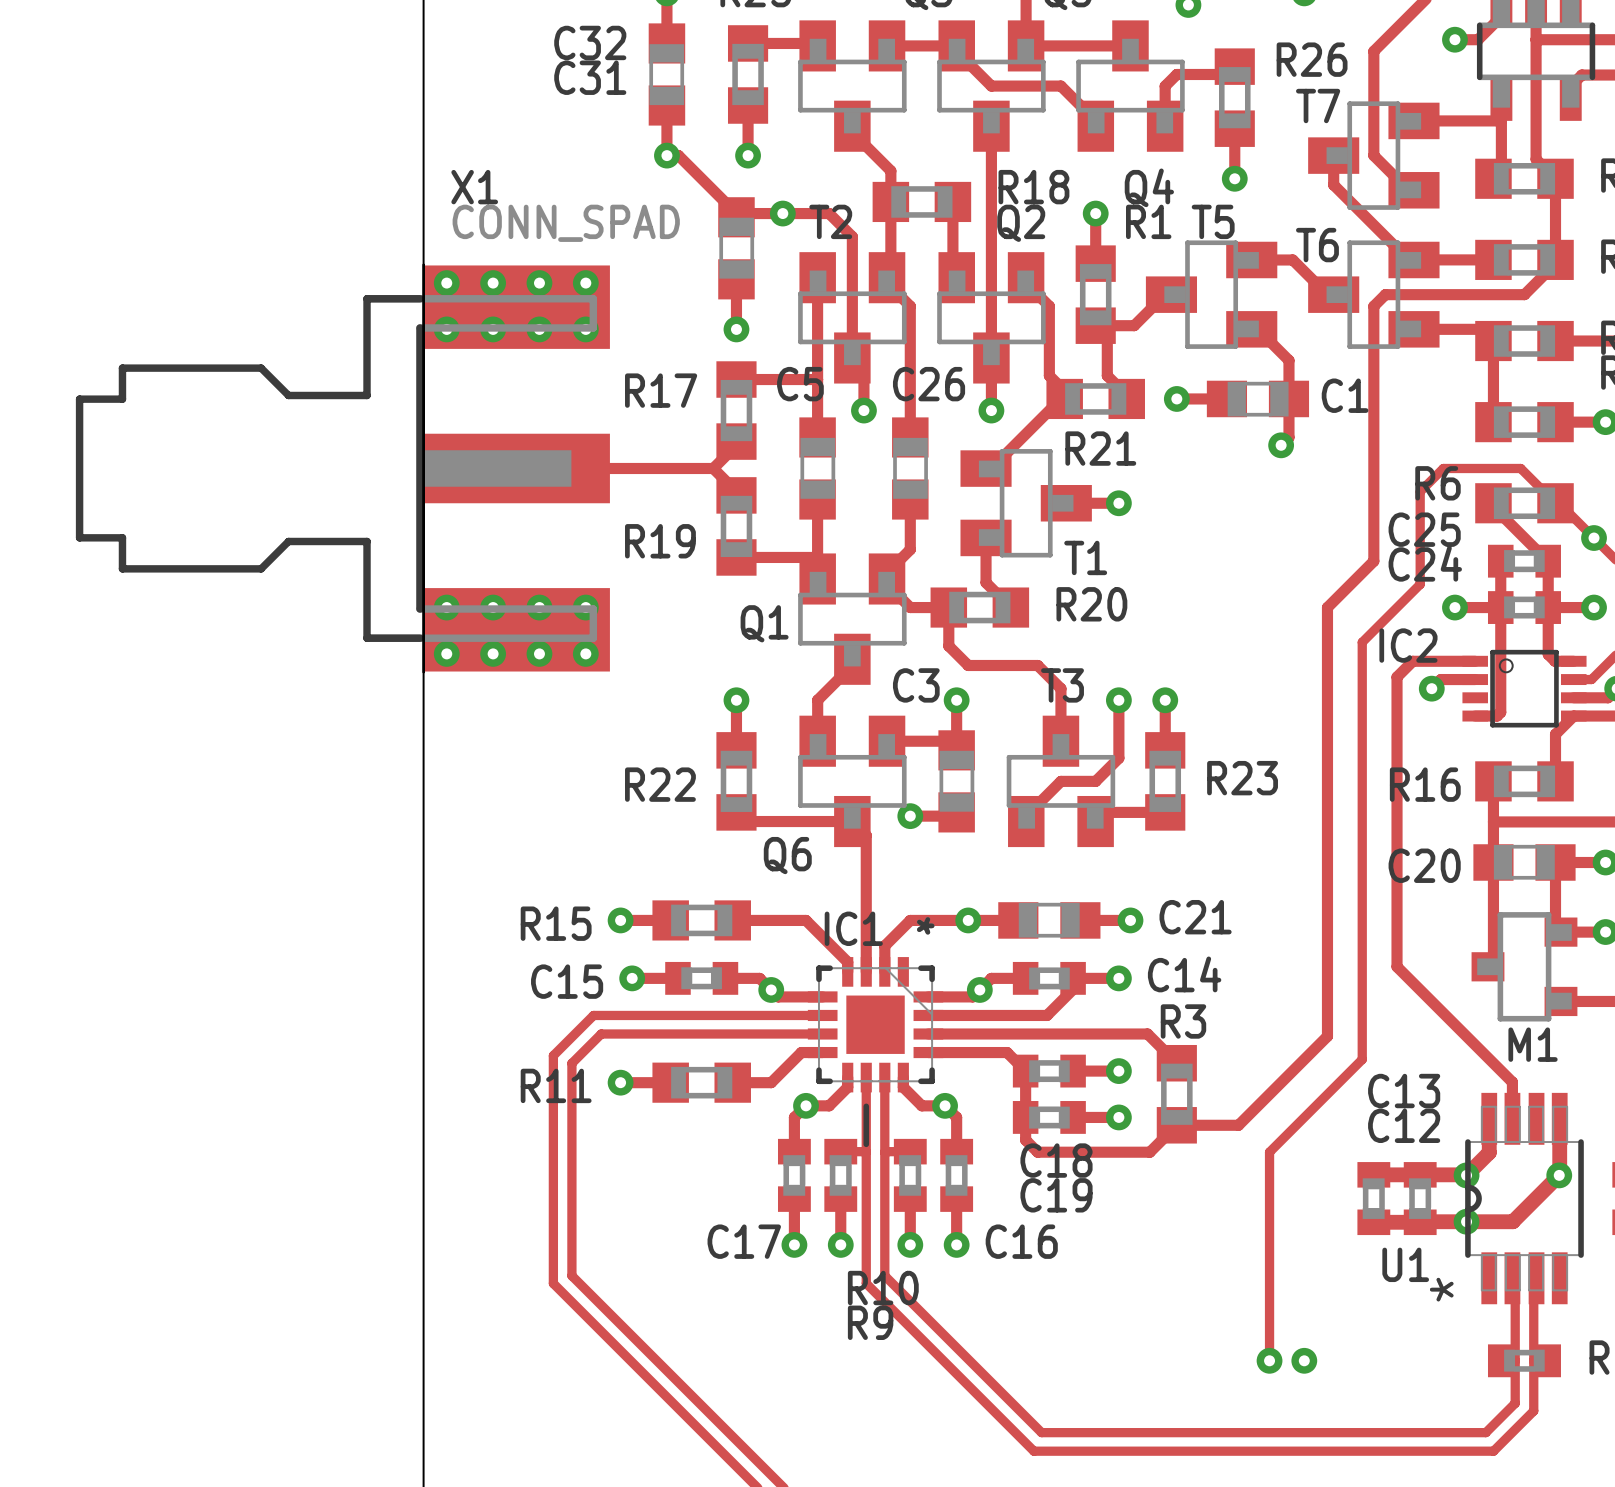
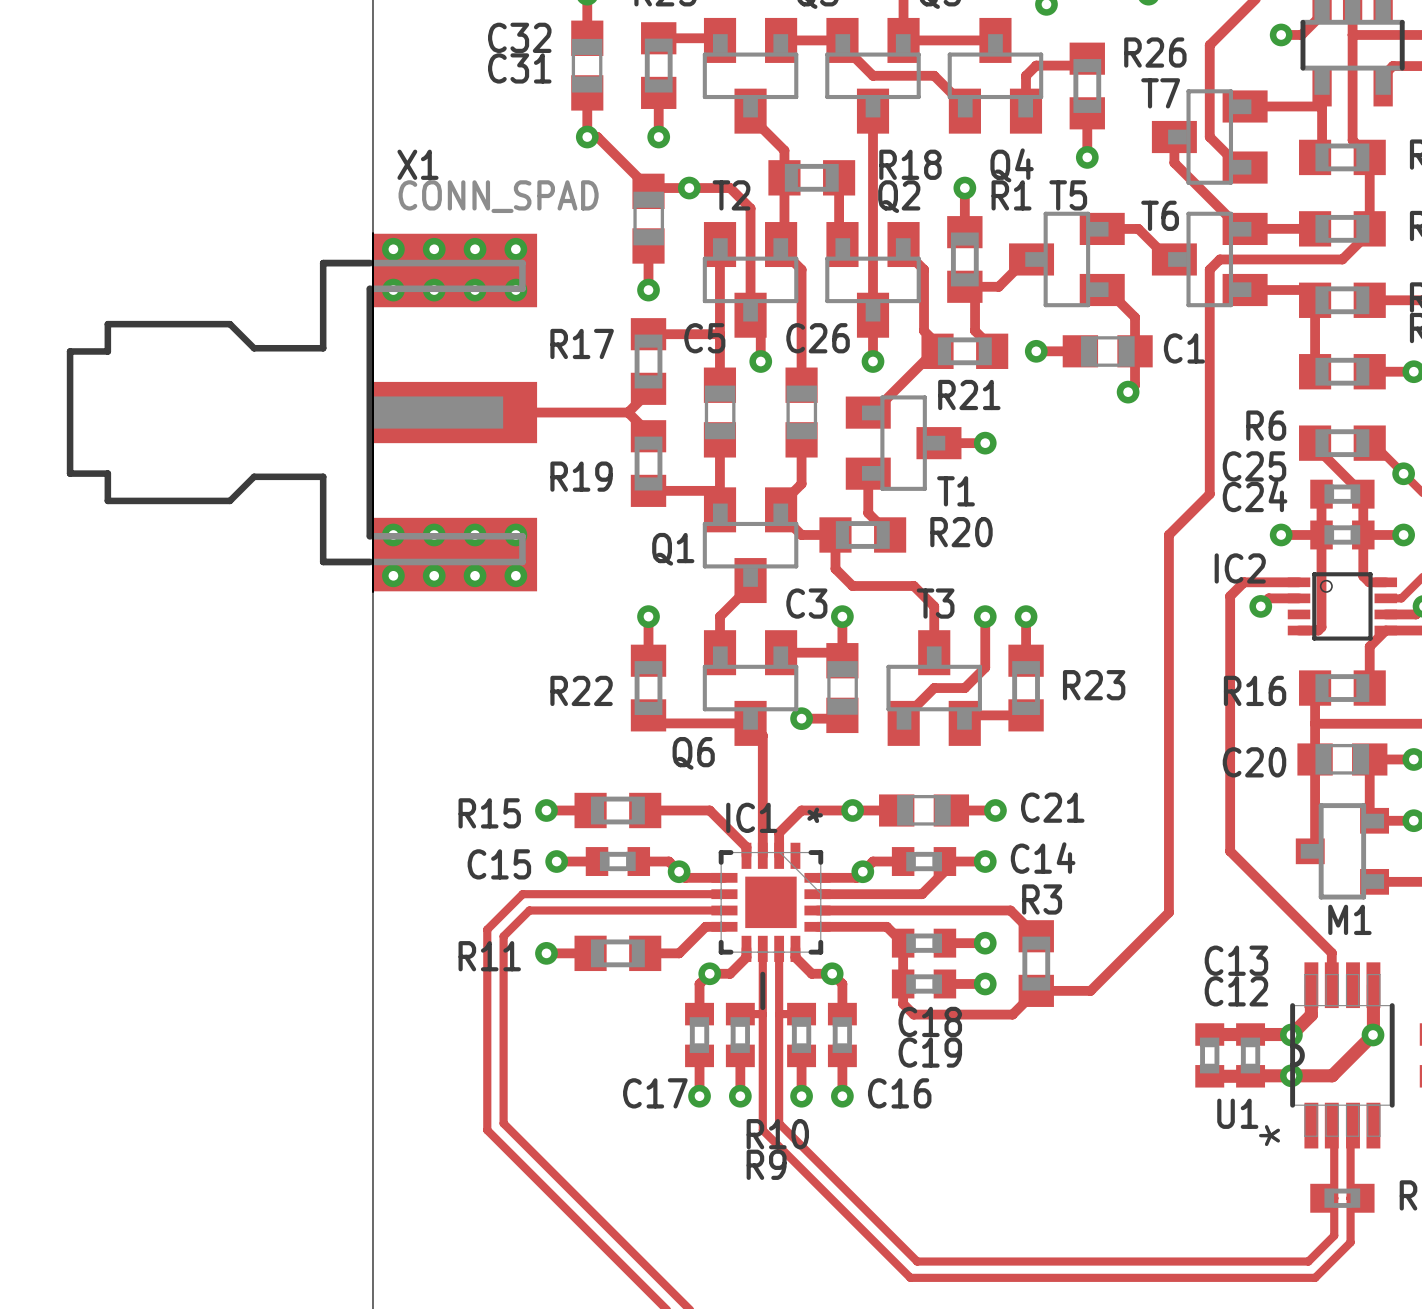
track: (1555, 503) (1520, 468) (1443, 468) (1420, 491) (1420, 584) (1362, 642) (1362, 1059) (1269, 1152) (1269, 1360) -> none
via: (1269, 1360) -> none
via: (1304, 1360) -> none

